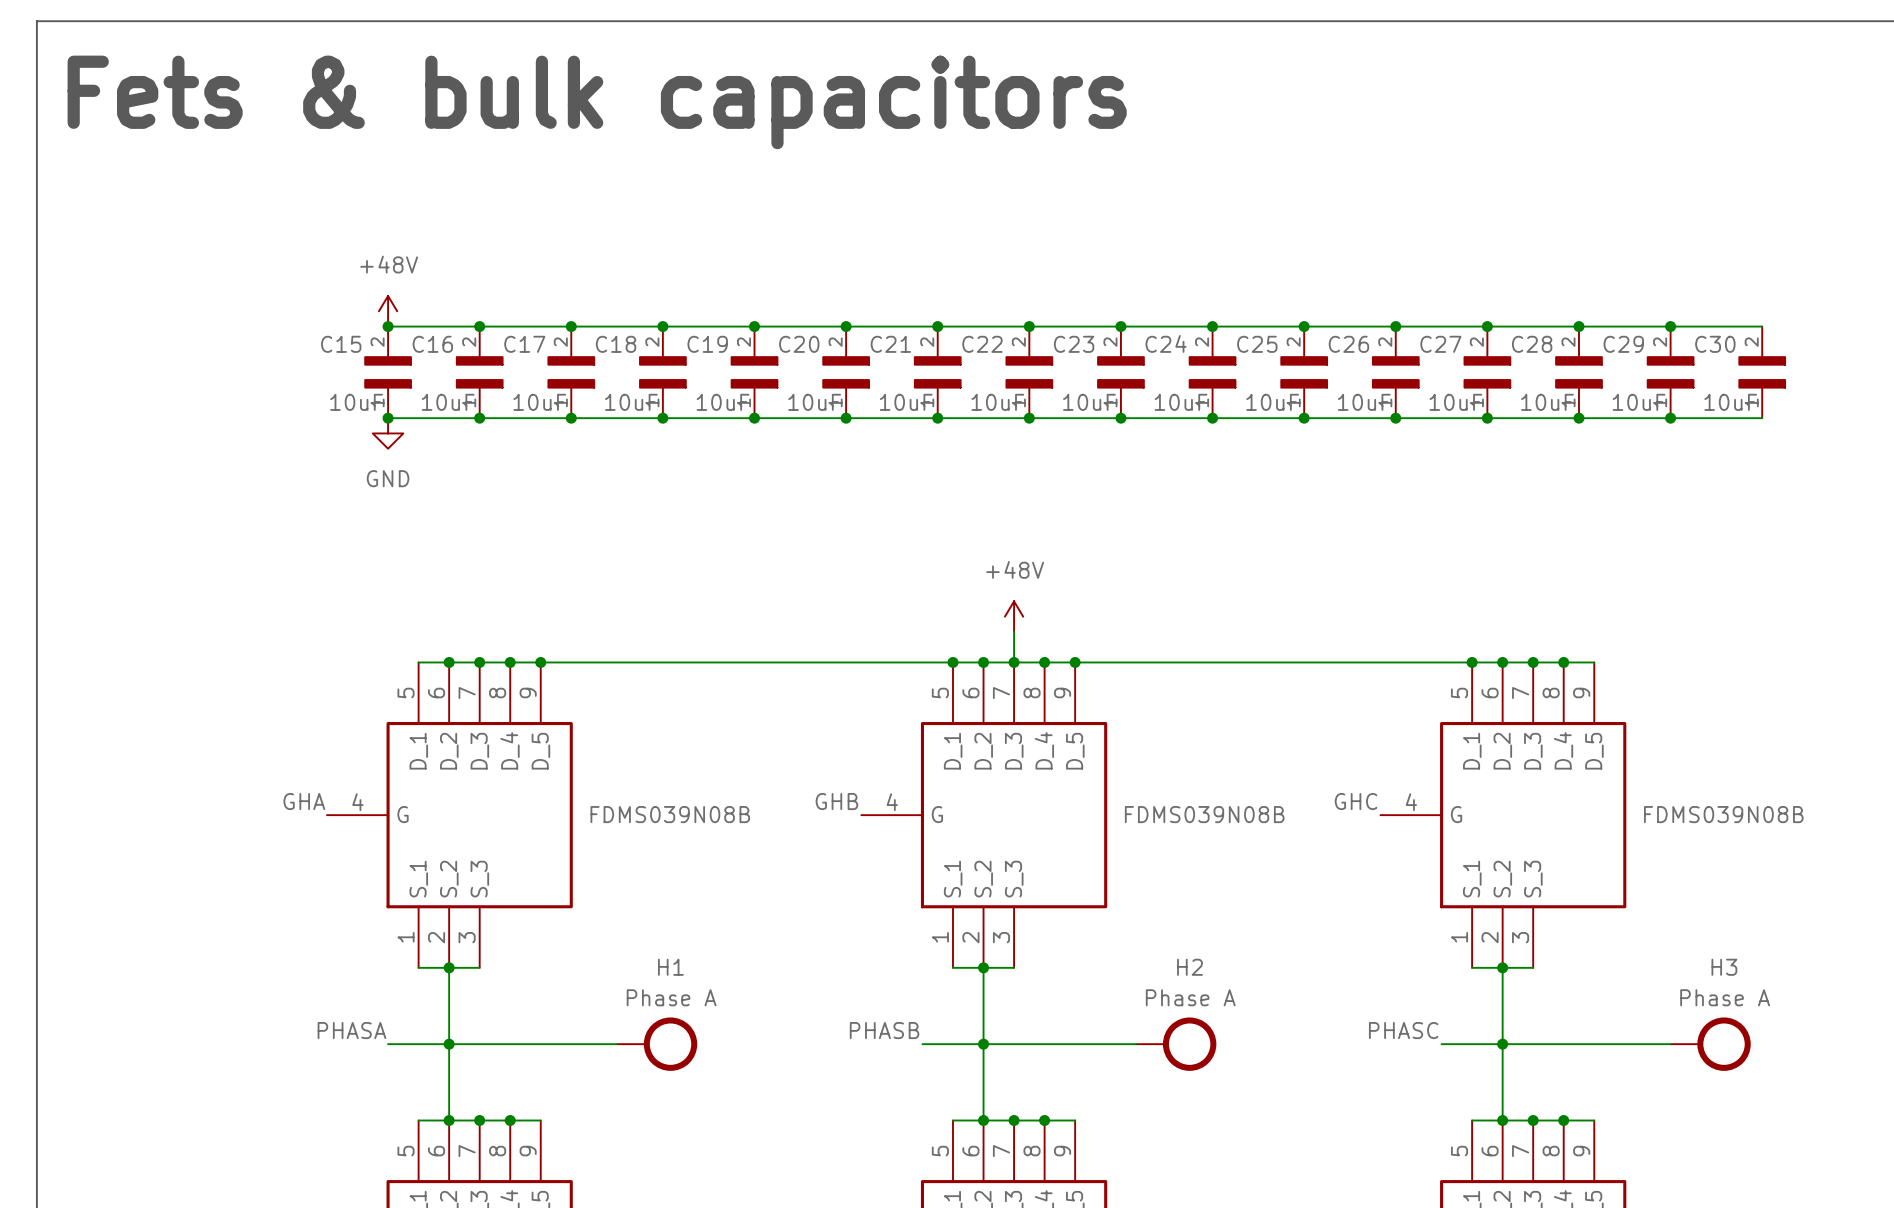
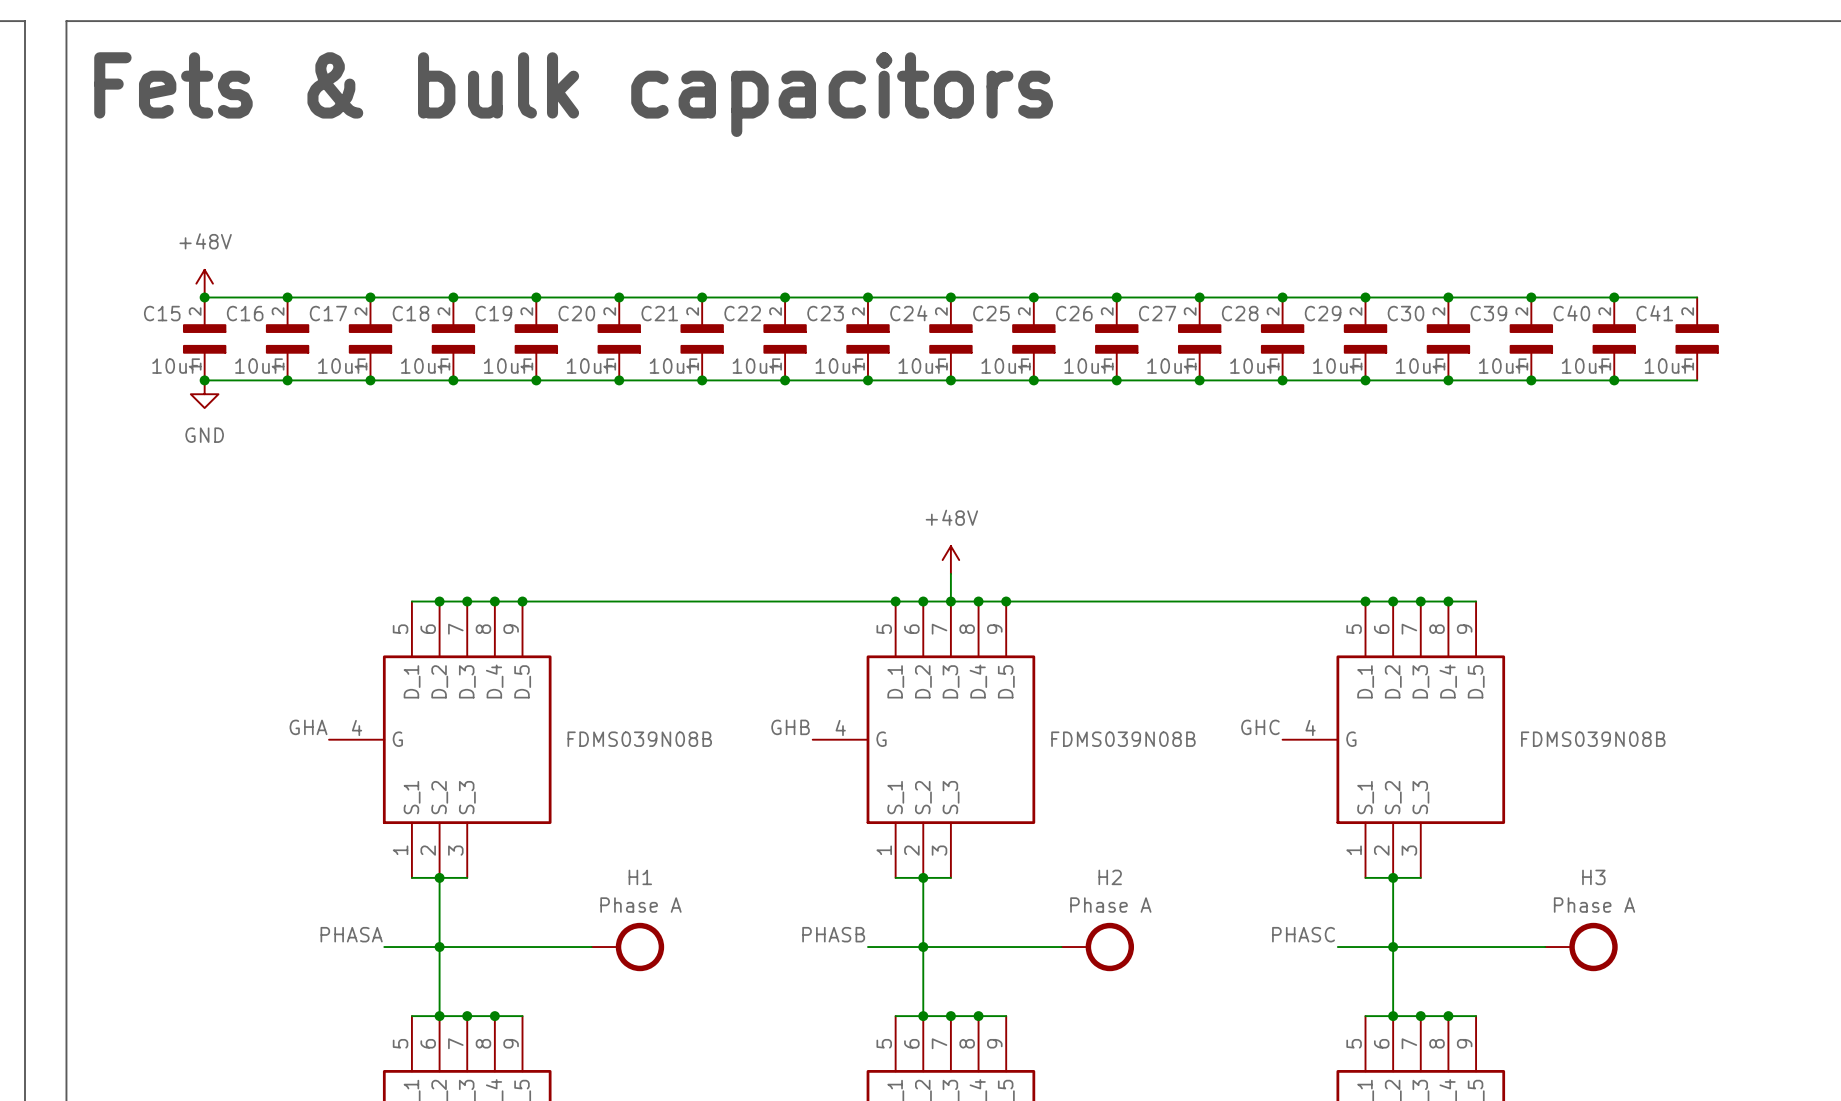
power symbol position: +48V (388, 311) -> +48V (204, 283)
wire: none -> (204, 297) (384, 297)
junction: none -> (204, 297)
junction: none -> (287, 297)
junction position: (388, 326) -> (370, 297)
junction position: (479, 326) -> (453, 297)
junction position: (571, 326) -> (536, 297)
junction position: (662, 326) -> (619, 297)
junction position: (754, 326) -> (702, 297)
junction position: (846, 326) -> (785, 297)
junction position: (937, 326) -> (867, 297)
junction position: (1029, 326) -> (950, 297)
junction position: (1120, 326) -> (1033, 297)
junction position: (1212, 326) -> (1116, 297)
junction position: (1304, 326) -> (1199, 297)
junction position: (1395, 326) -> (1282, 297)
junction position: (1487, 326) -> (1365, 297)
junction position: (1578, 326) -> (1448, 297)
junction position: (1670, 326) -> (1531, 297)
junction: none -> (1614, 297)
wire: none -> (1628, 297) (1697, 297)
C15 position: (388, 372) -> (204, 338)
C16 position: (479, 372) -> (287, 338)
C17 position: (571, 372) -> (370, 338)
C18 position: (662, 372) -> (453, 338)
C19 position: (754, 372) -> (536, 338)
C20 position: (846, 372) -> (619, 338)
C21 position: (937, 372) -> (702, 338)
C22 position: (1029, 372) -> (785, 338)
C23 position: (1120, 372) -> (868, 338)
C24 position: (1212, 372) -> (950, 338)
C25 position: (1304, 372) -> (1033, 338)
C26 position: (1395, 372) -> (1116, 338)
C27 position: (1487, 372) -> (1199, 338)
C28 position: (1579, 372) -> (1282, 338)
C39: none -> 10uF (1531, 338)
C29 position: (1670, 372) -> (1365, 338)
C40: none -> 10uF (1614, 338)
C30 position: (1762, 372) -> (1448, 338)
C41: none -> 10uF (1697, 338)
wire: none -> (204, 380) (384, 380)
junction: none -> (204, 380)
junction: none -> (287, 380)
junction position: (388, 418) -> (370, 380)
junction position: (479, 418) -> (453, 380)
junction position: (571, 418) -> (536, 380)
junction position: (662, 418) -> (619, 380)
junction position: (754, 418) -> (702, 380)
junction position: (846, 418) -> (785, 380)
junction position: (937, 418) -> (867, 380)
junction position: (1029, 418) -> (950, 380)
junction position: (1120, 418) -> (1033, 380)
junction position: (1212, 418) -> (1116, 380)
junction position: (1304, 418) -> (1199, 380)
junction position: (1395, 418) -> (1282, 380)
junction position: (1487, 418) -> (1365, 380)
junction position: (1578, 418) -> (1448, 380)
junction position: (1670, 418) -> (1531, 380)
junction: none -> (1614, 380)
wire: none -> (1628, 380) (1697, 380)
power symbol position: GND (388, 433) -> GND (204, 394)

